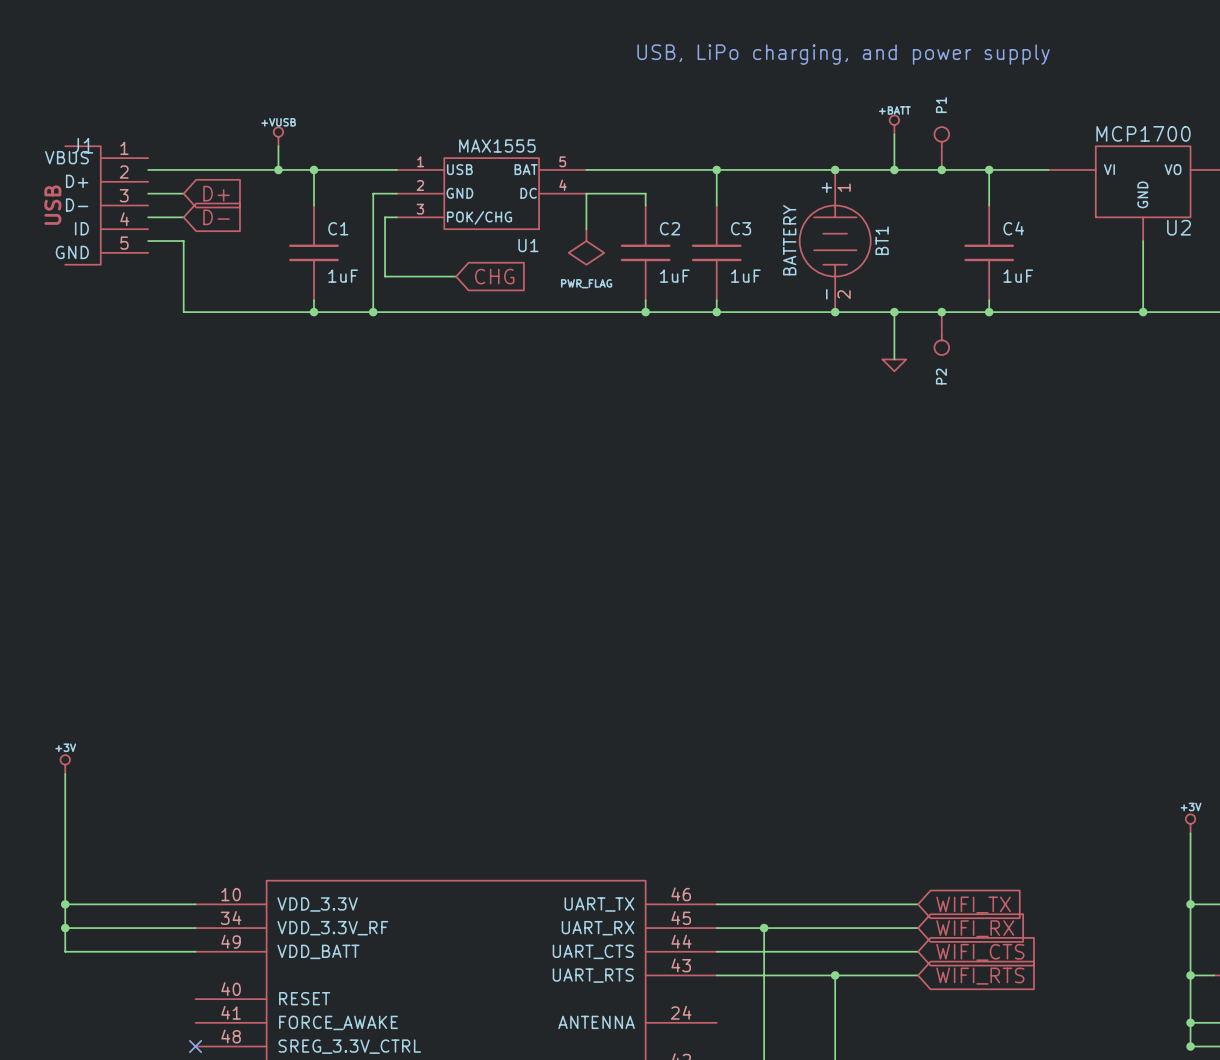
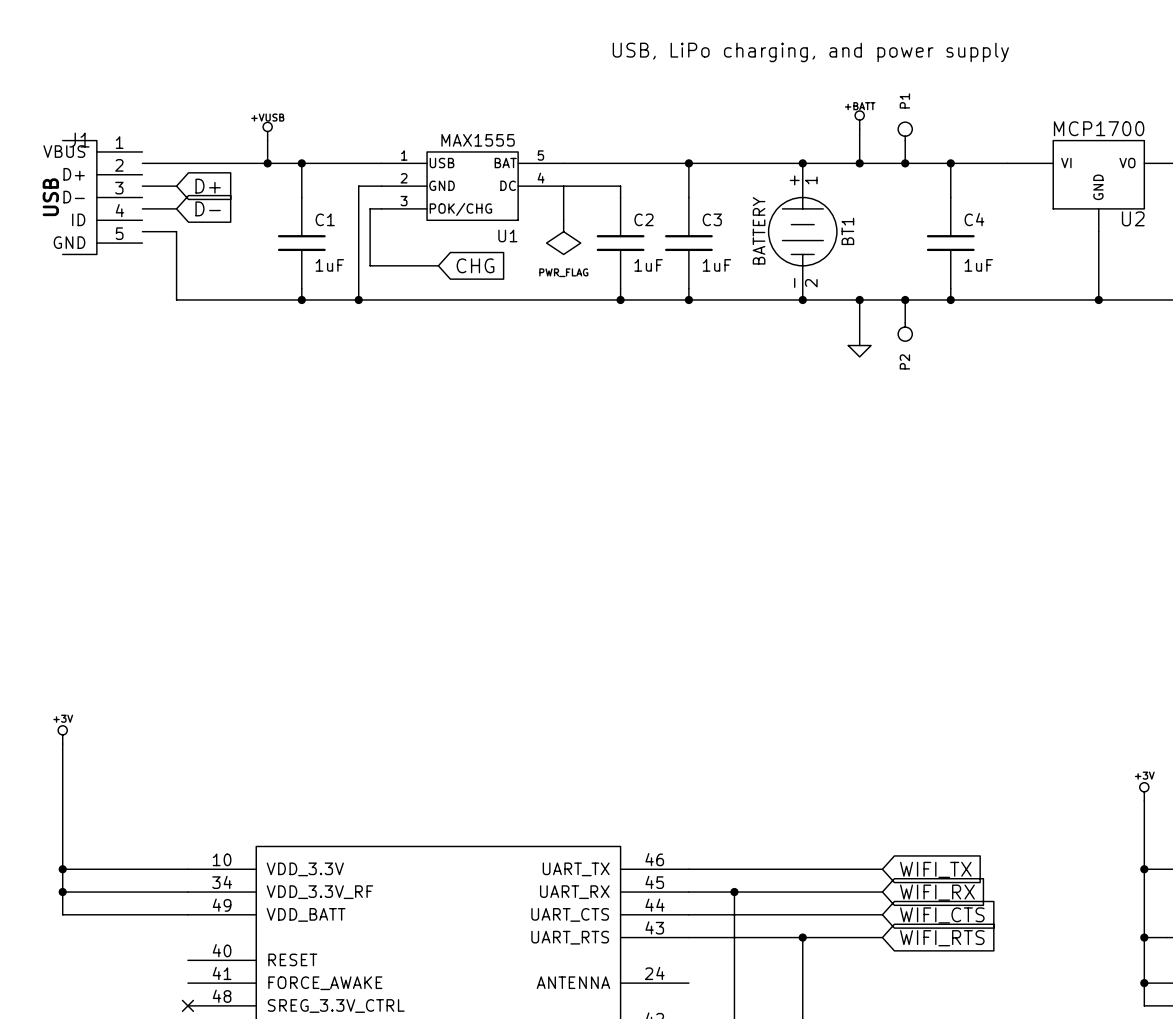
junction: (1190, 1046) -> none

